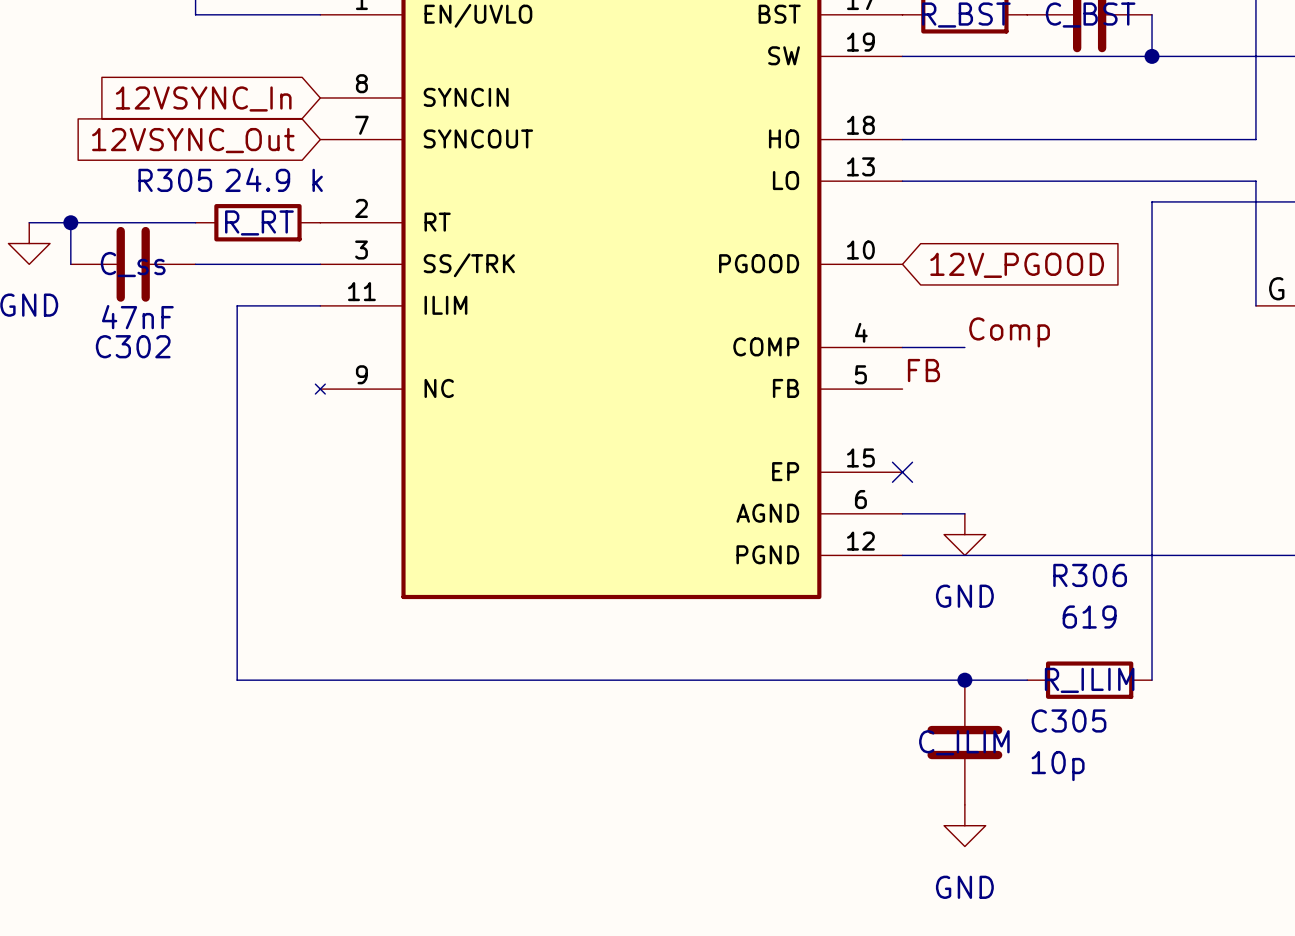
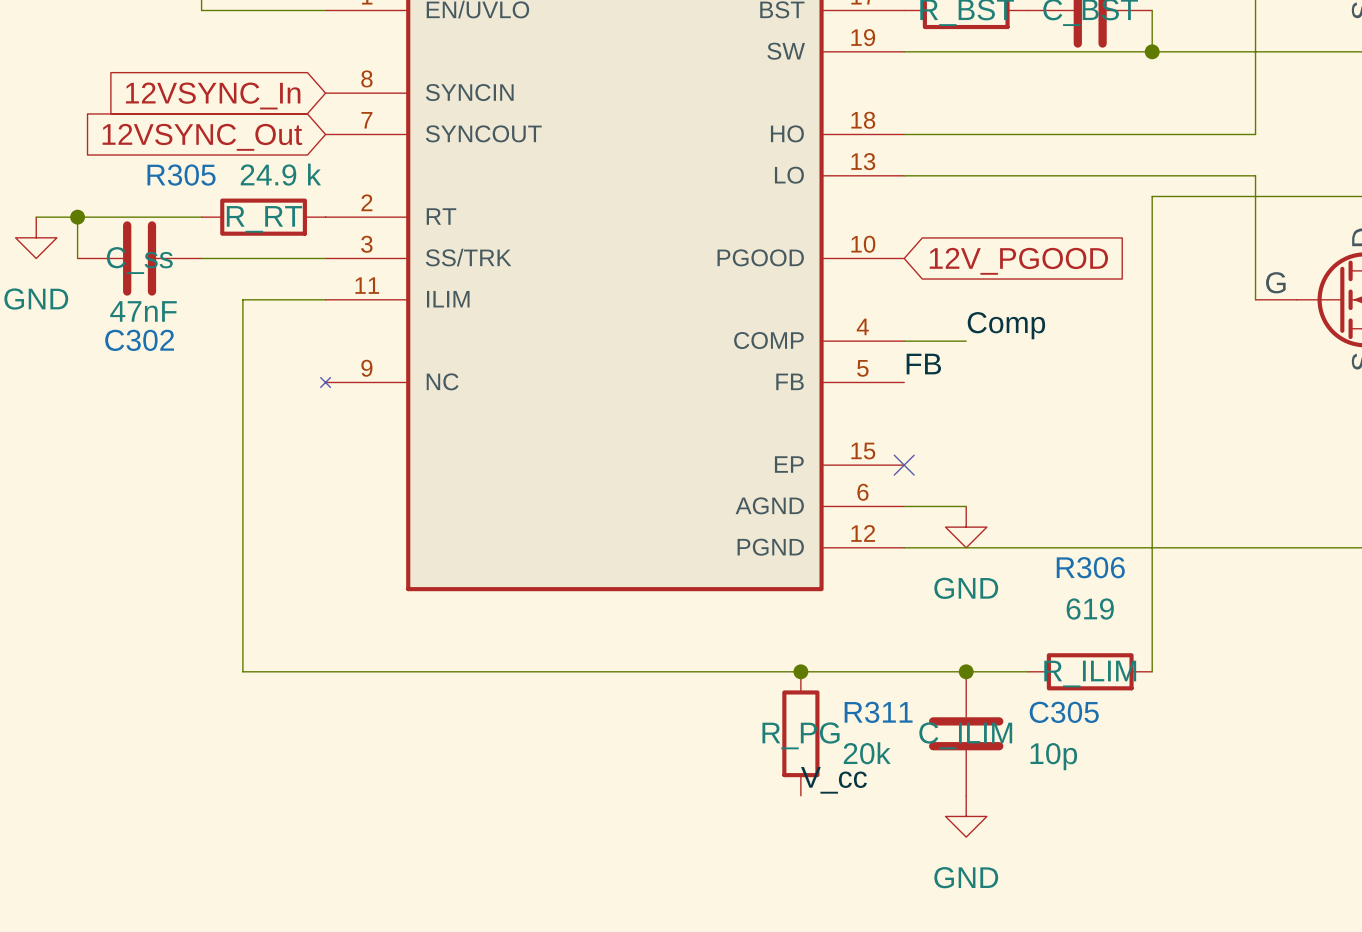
junction: none -> (800, 671)
R311: none -> 20k (800, 733)
label: none -> V_cc (833, 780)

